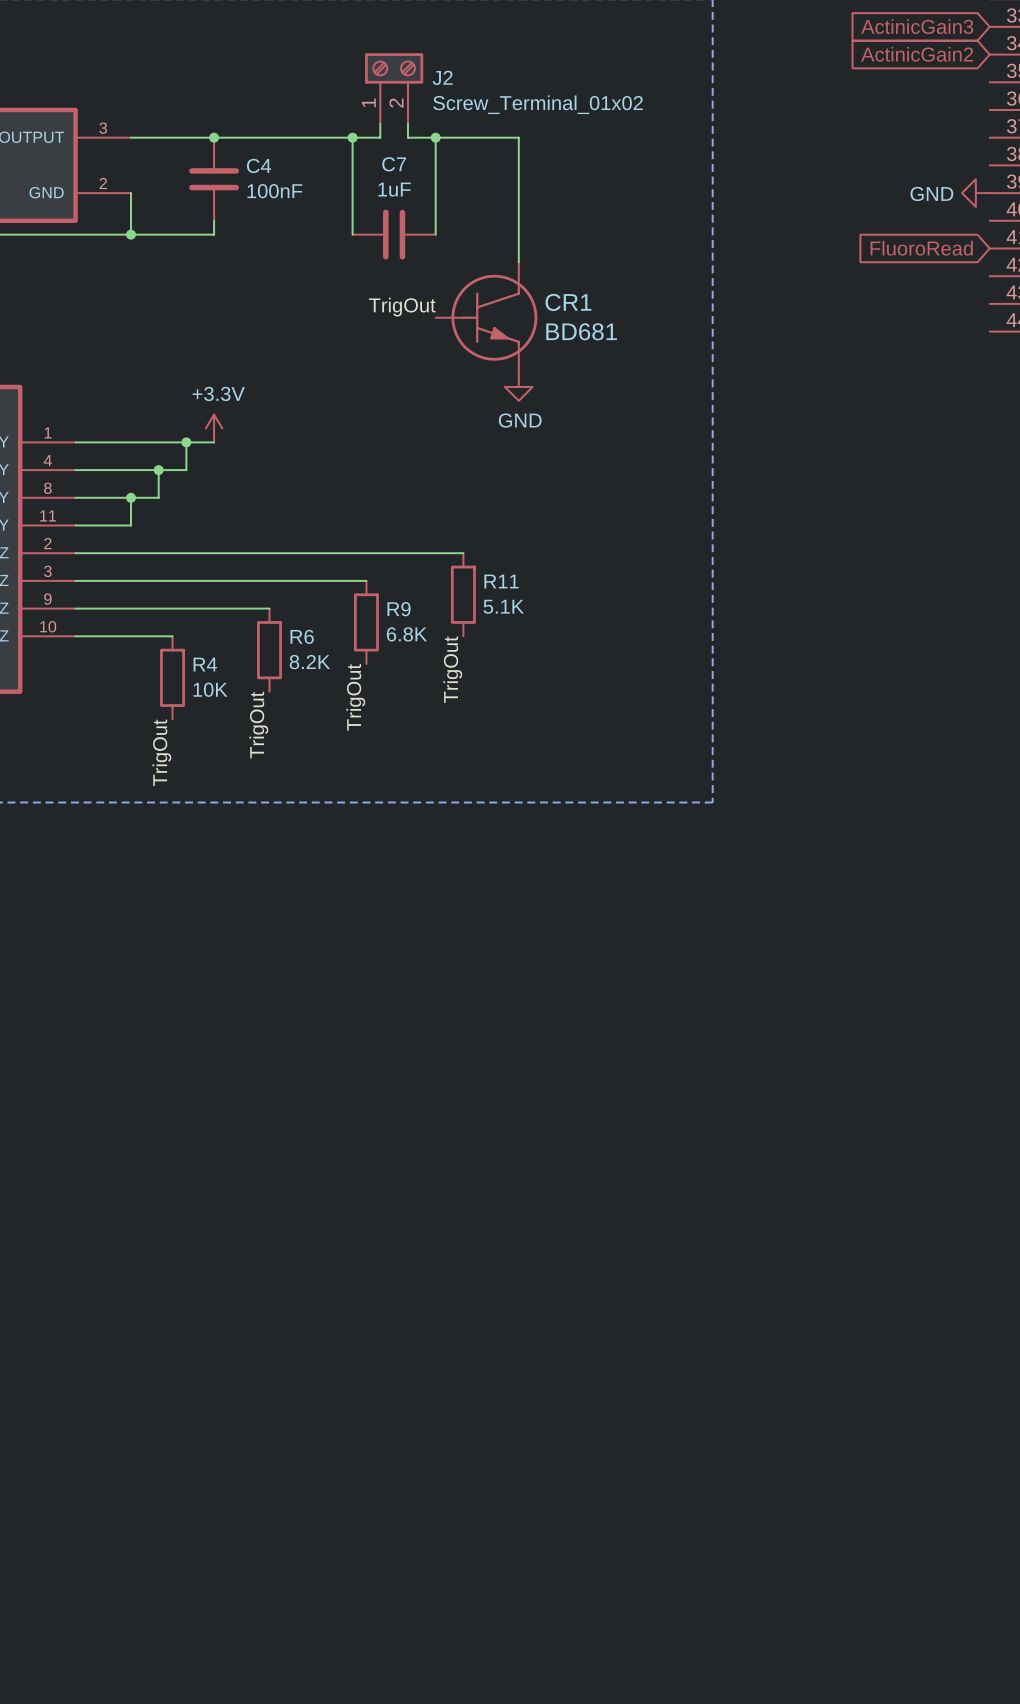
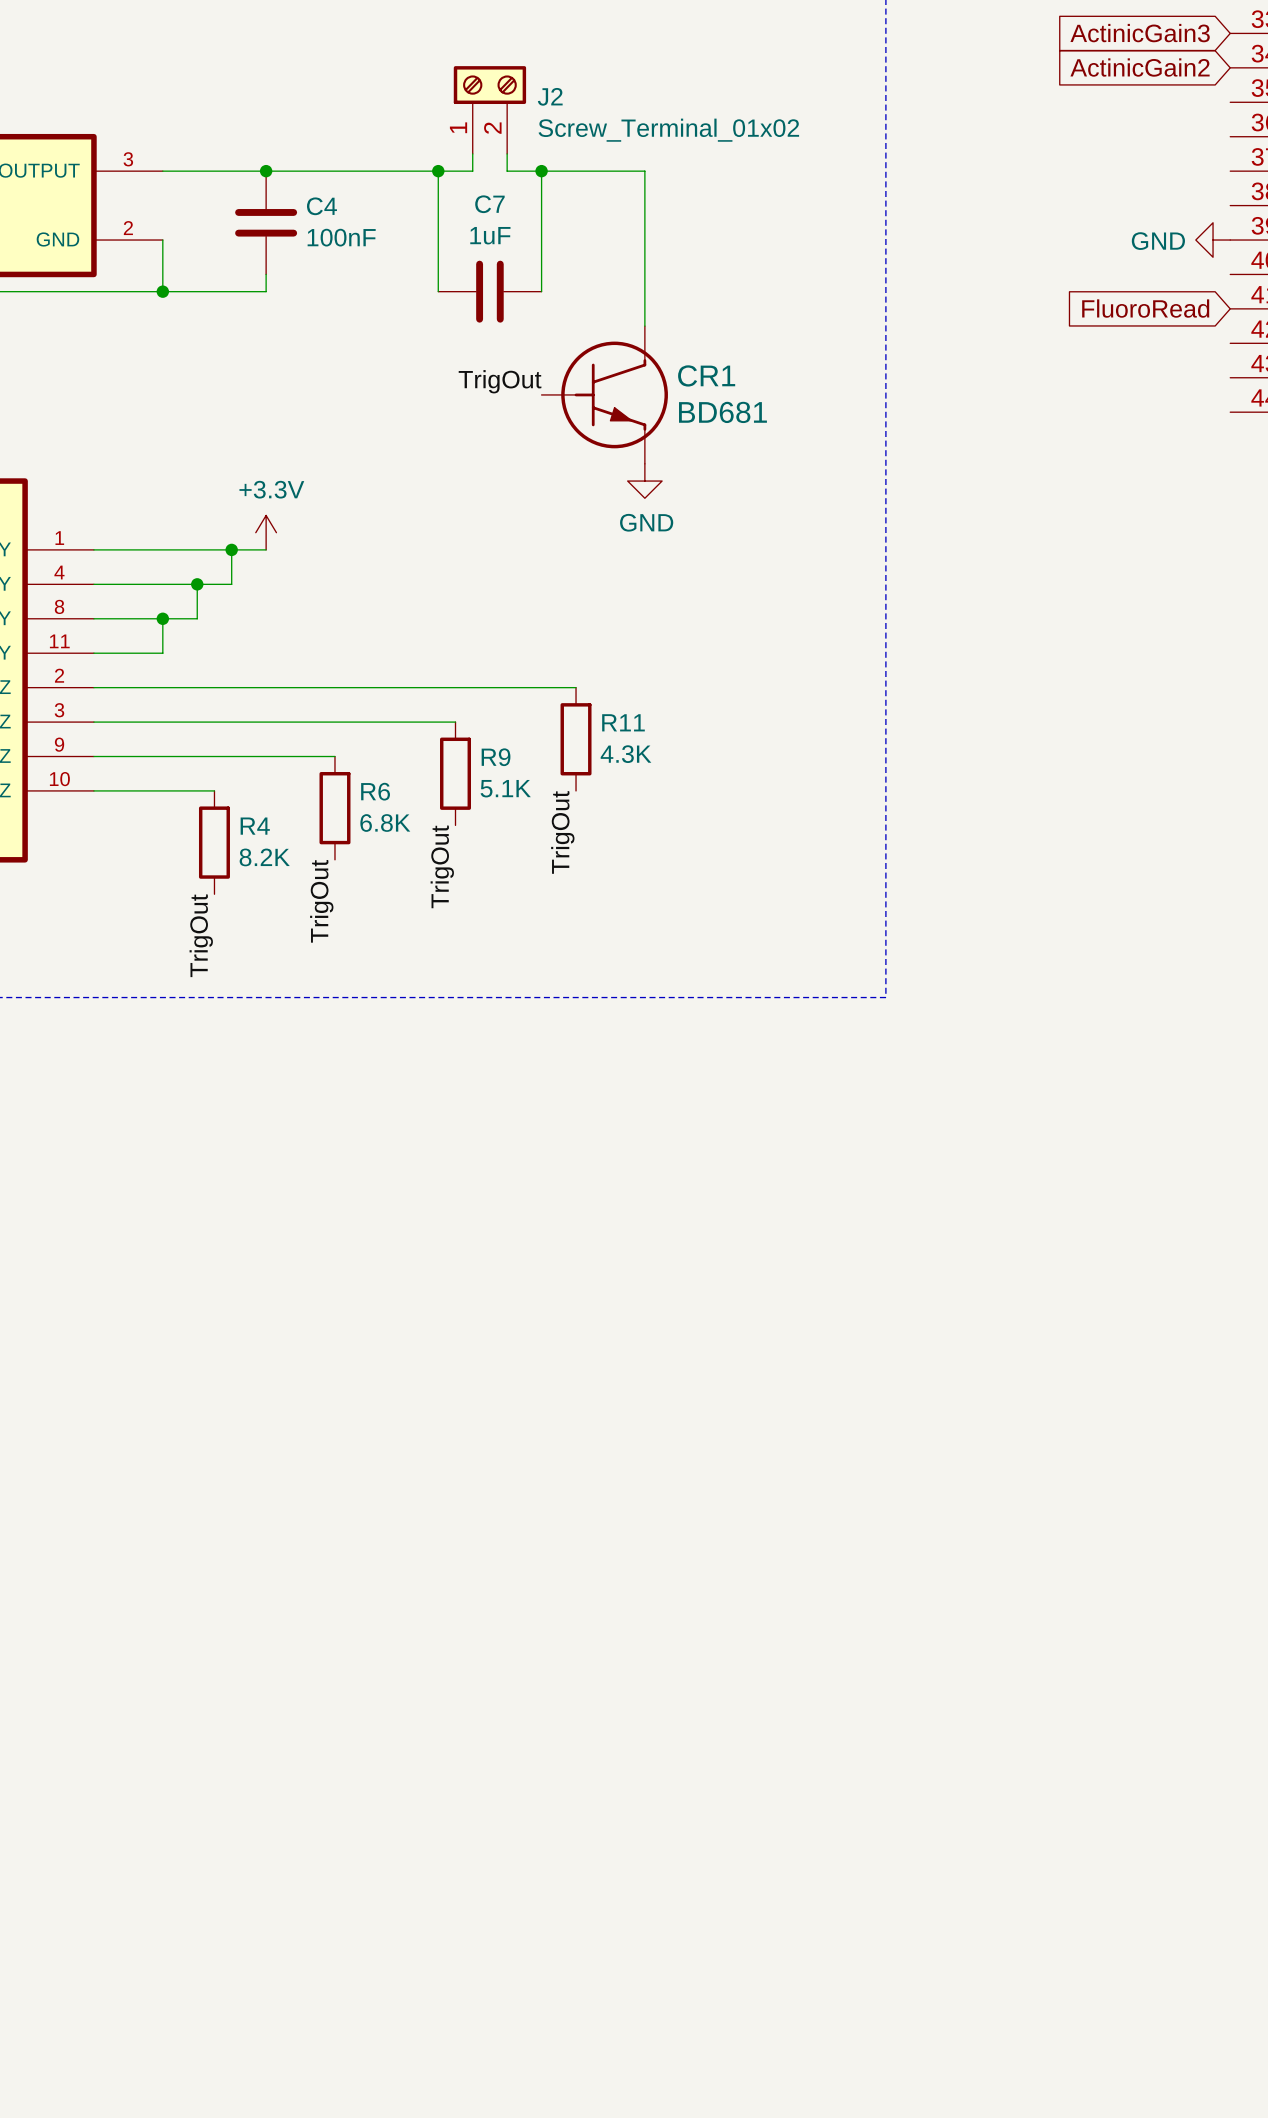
R11 value: 5.1K (503, 606) -> 4.3K (626, 754)
R9 value: 6.8K (406, 634) -> 5.1K (505, 788)
R6 value: 8.2K (309, 662) -> 6.8K (385, 823)
R4 value: 10K (210, 689) -> 8.2K (264, 857)

